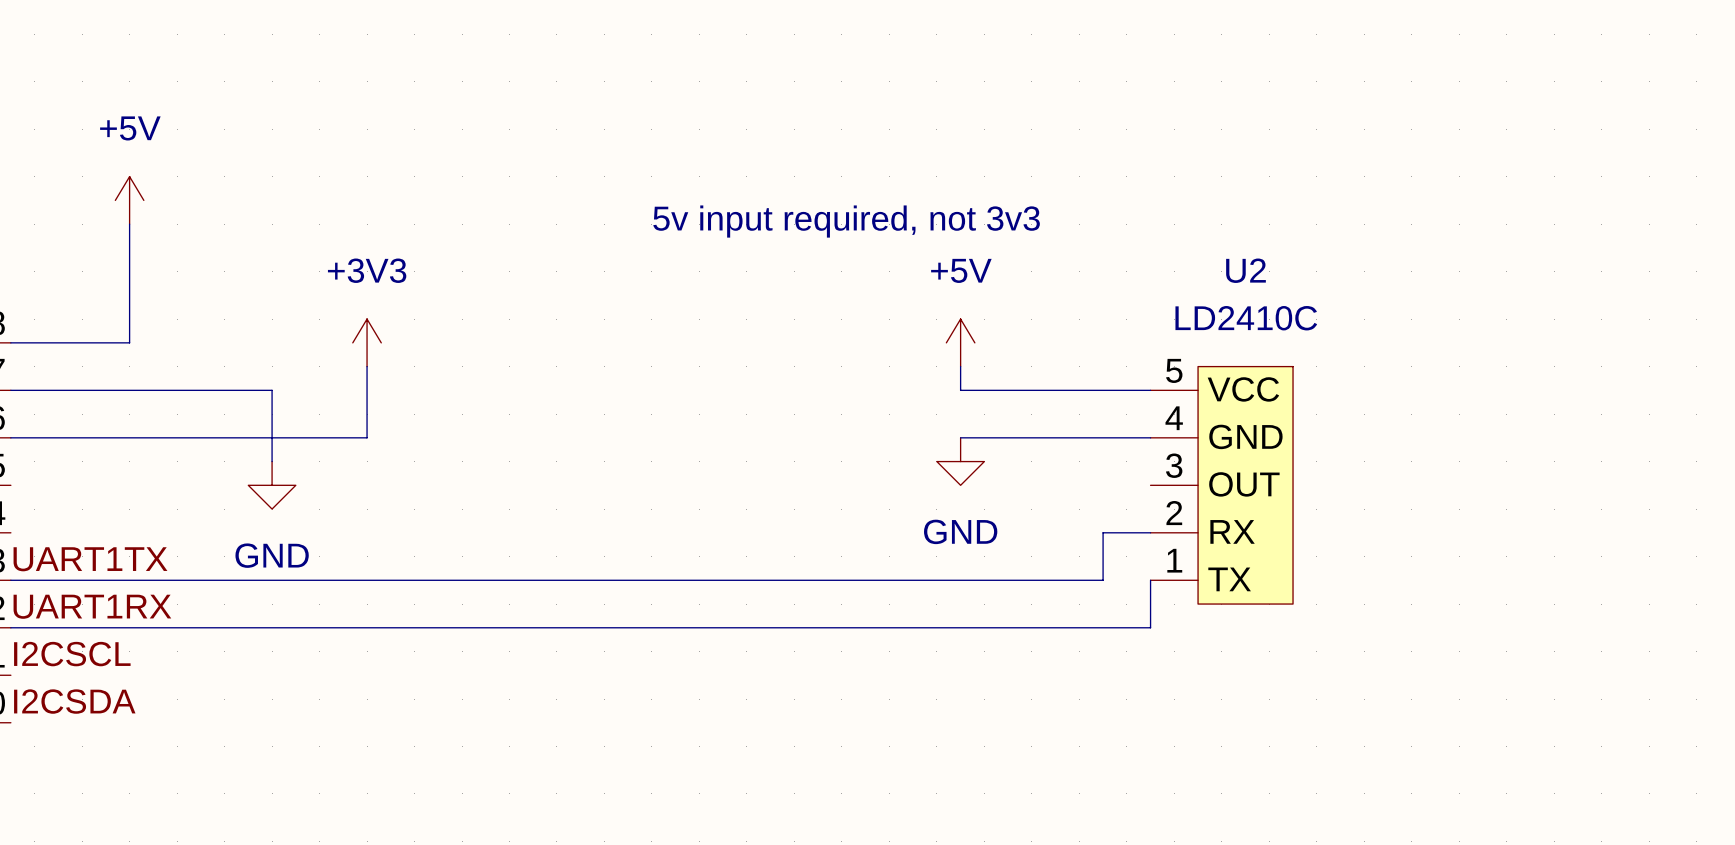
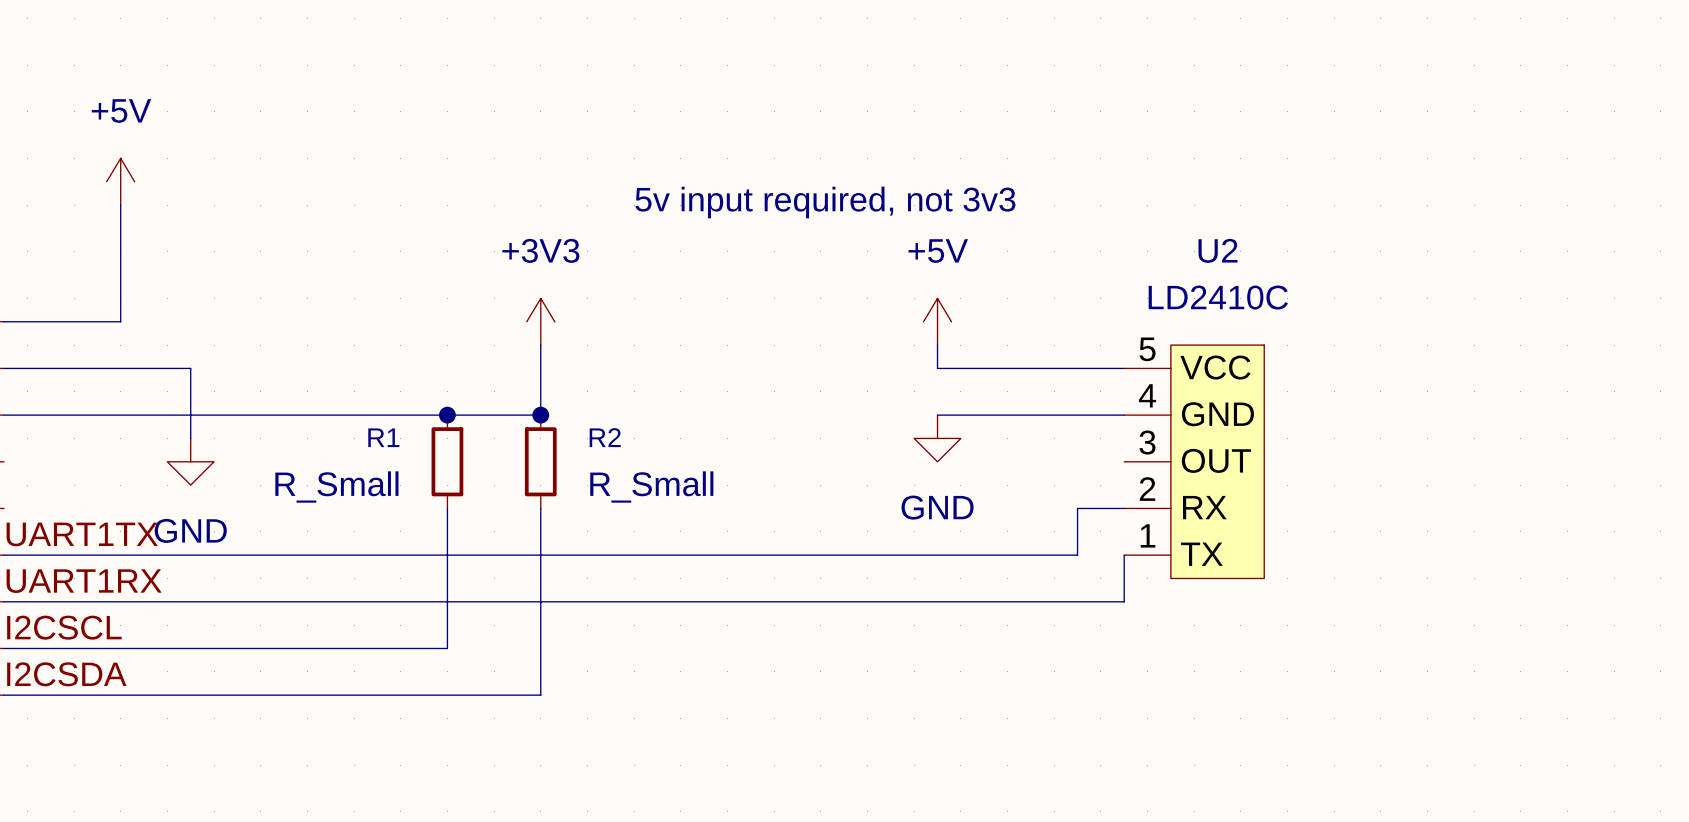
power symbol position: +3V3 (367, 342) -> +3V3 (540, 321)
wire: (367, 366) (367, 437) -> (540, 345) (540, 415) (354, 415)
wire: (200, 390) (272, 390) (272, 461) -> (190, 368) (190, 438)
junction: none -> (447, 415)
junction: none -> (540, 415)
power symbol position: GND (272, 485) -> GND (190, 461)
R1: none -> R_Small (447, 461)
R2: none -> R_Small (540, 461)
wire: none -> (447, 508) (447, 648) (4, 648)
wire: none -> (540, 508) (540, 695) (4, 695)

